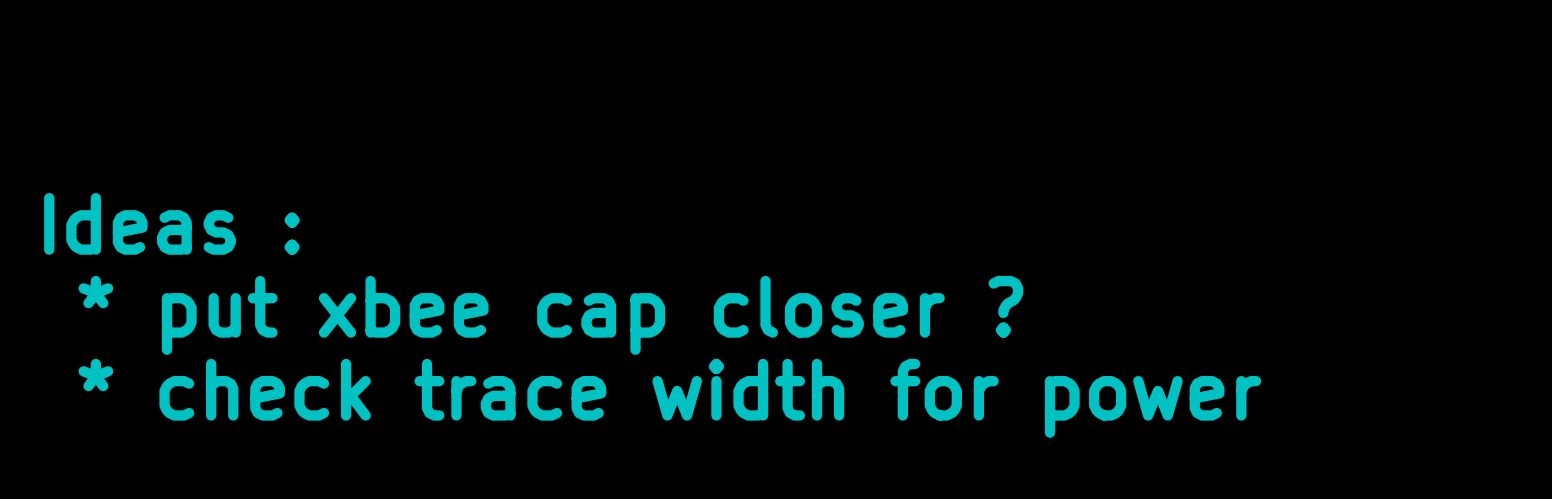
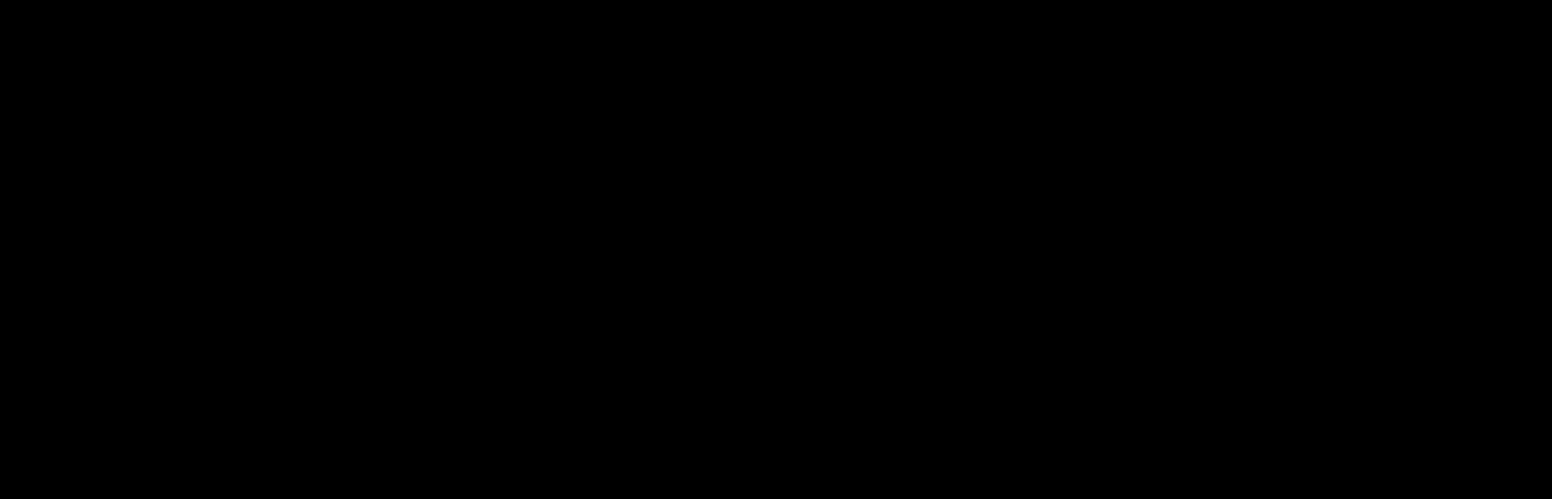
text: Ideas : (171, 223) -> none
text: * put xbee cap closer ? (550, 315) -> none
text: * check trace width for power (669, 398) -> none

